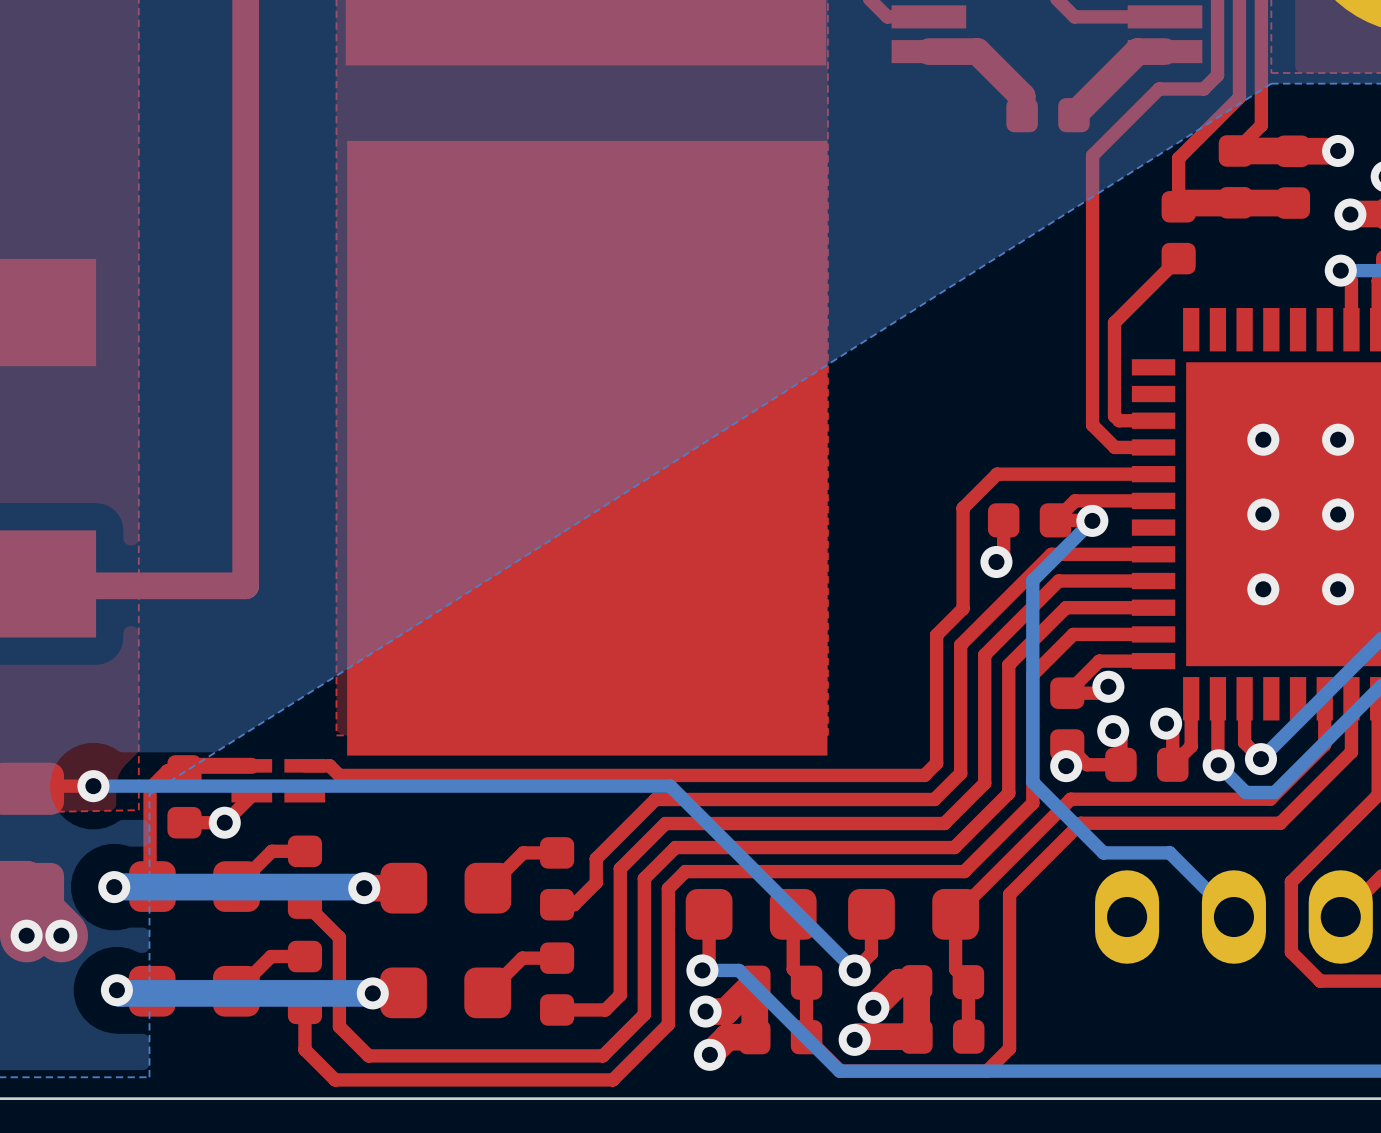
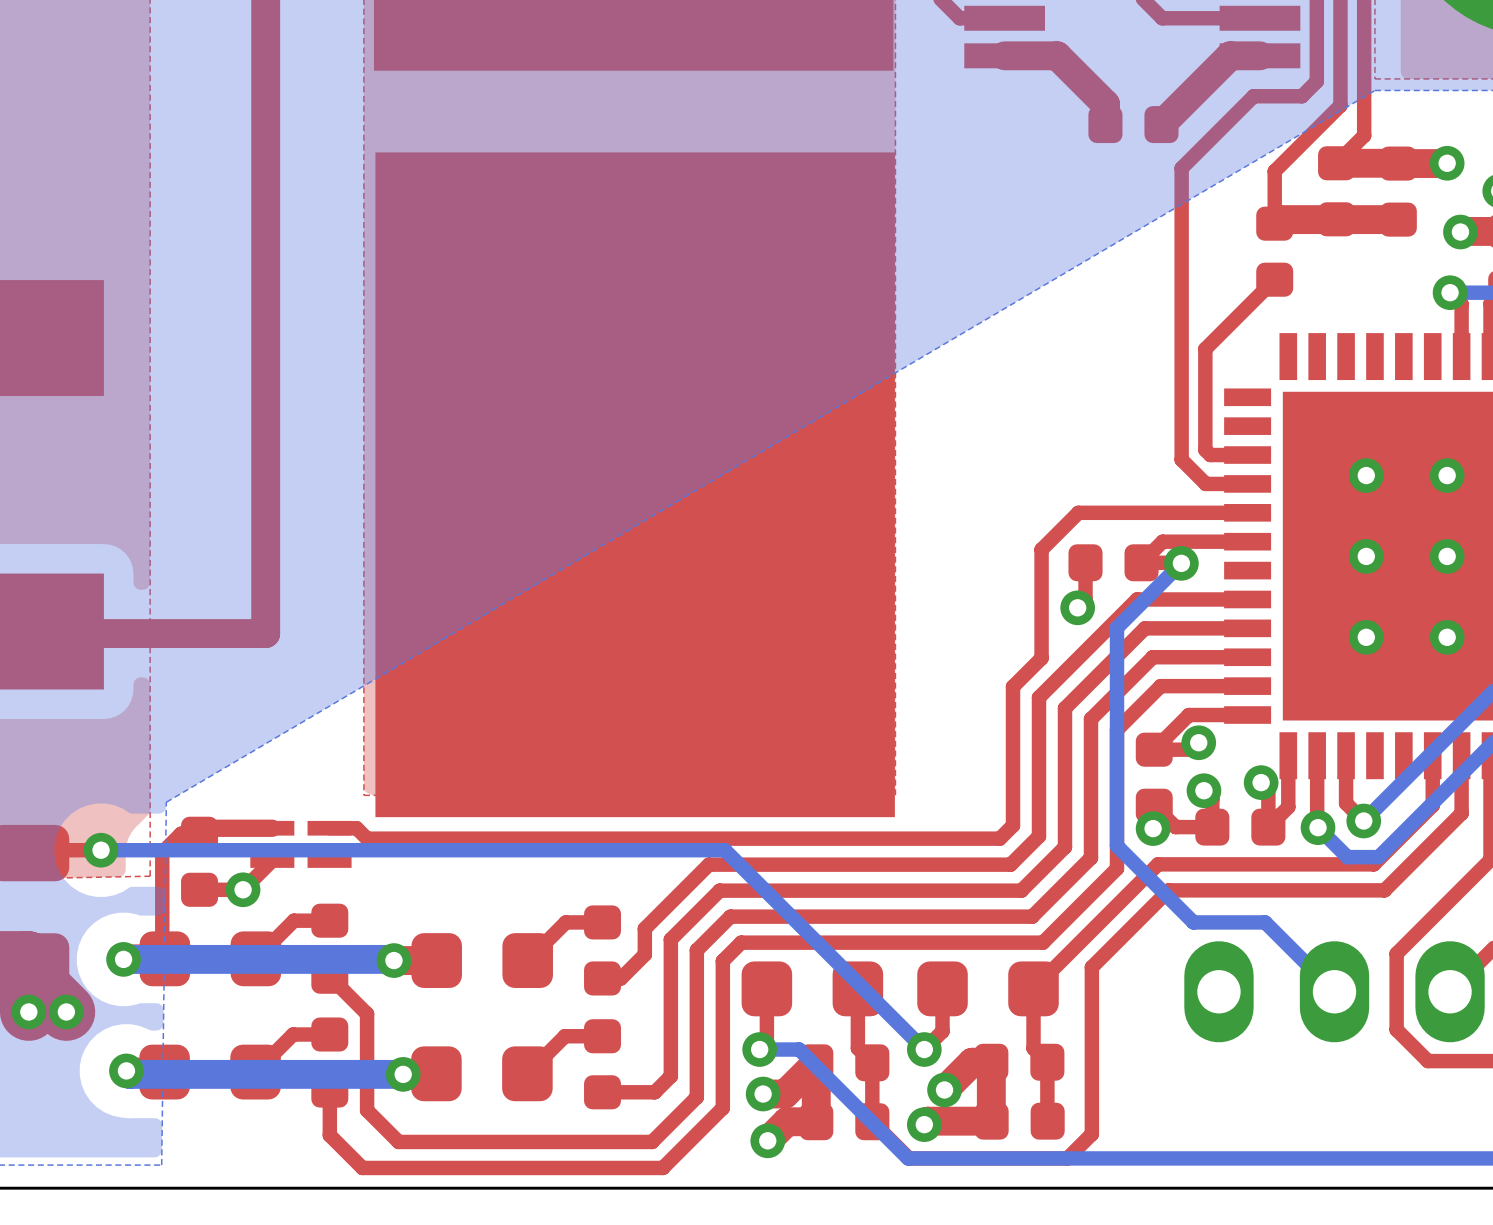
bottom zone outline: (1271, 83) (149, 794) (149, 1077) -> (1374, 90) (166, 802) (161, 1165)

